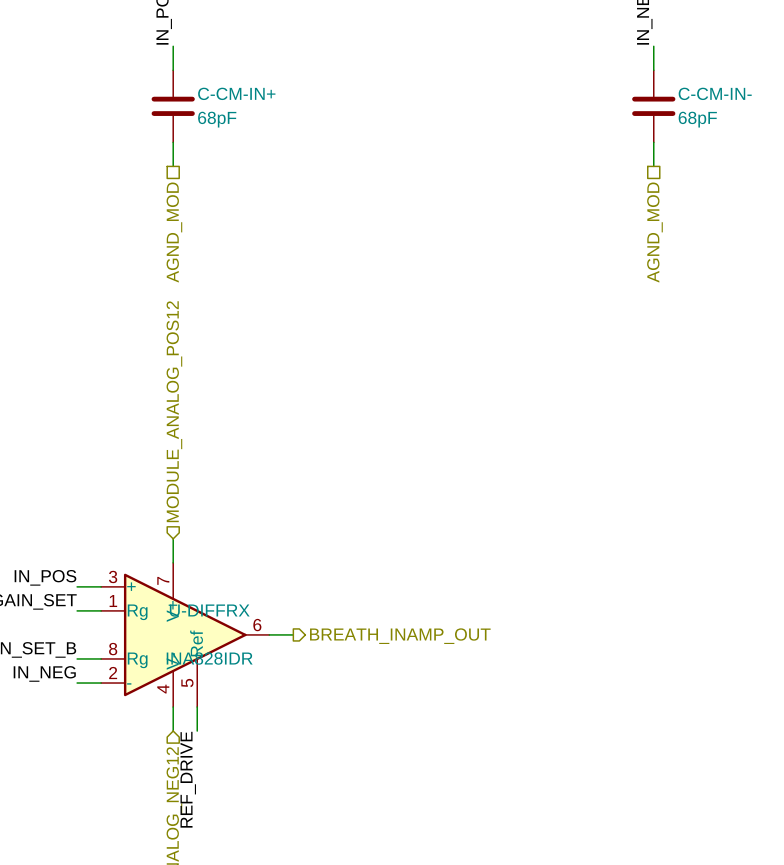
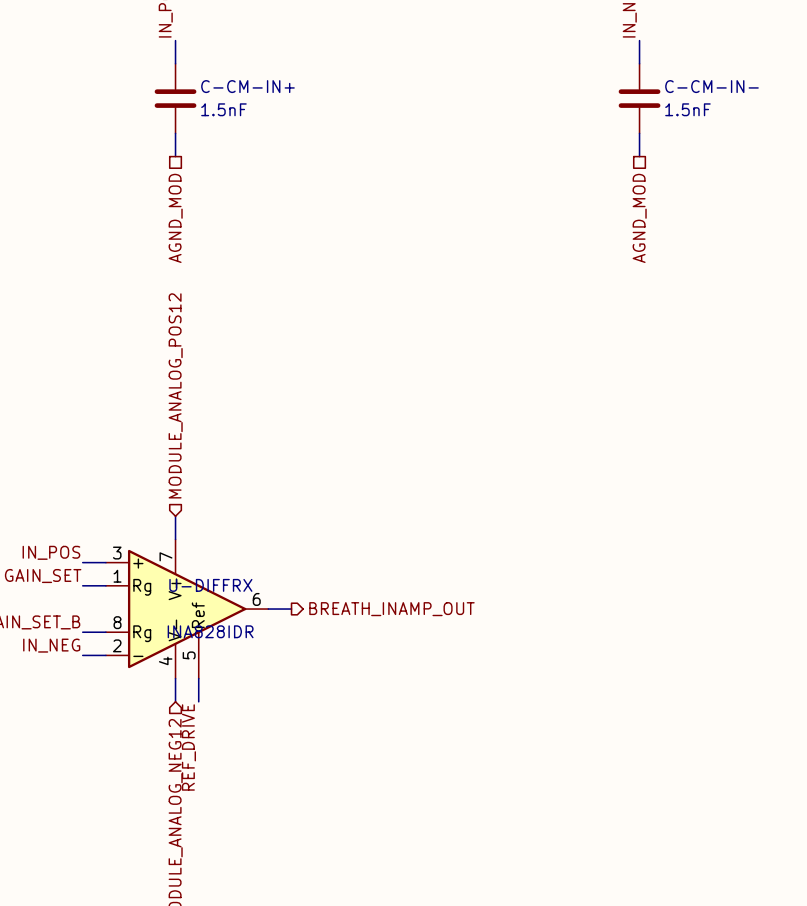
C-CM-IN+ value: 68pF (217, 119) -> 1.5nF (223, 109)
C-CM-IN- value: 68pF (697, 119) -> 1.5nF (687, 109)

